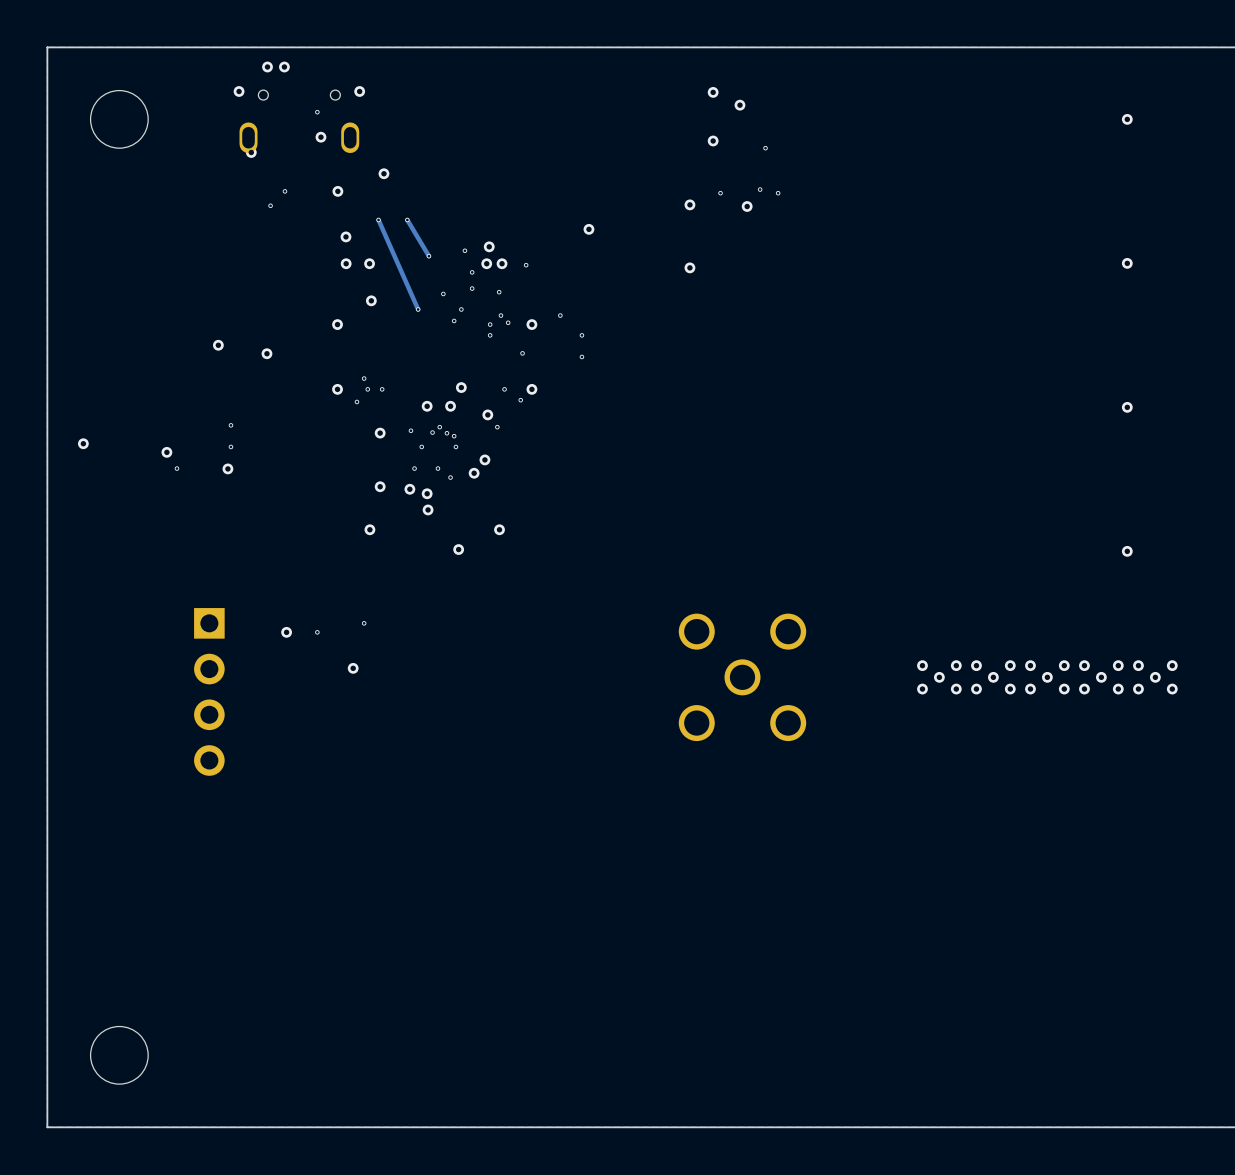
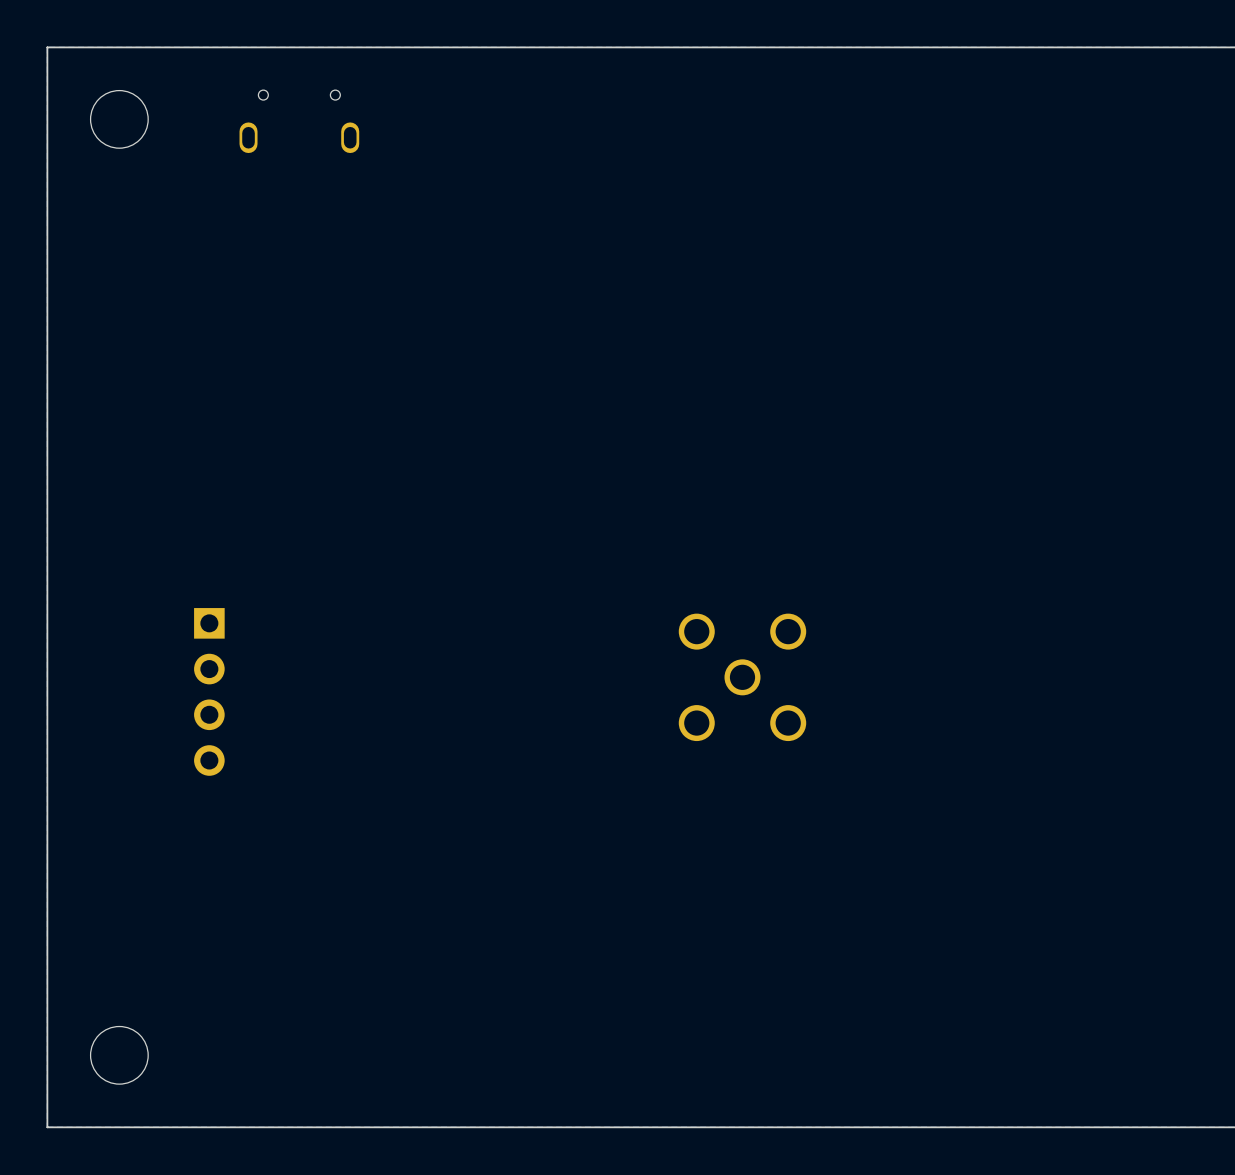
via: (267, 67) -> none
via: (284, 67) -> none
via: (239, 91) -> none
via: (359, 91) -> none
via: (713, 92) -> none
via: (739, 105) -> none
via: (317, 112) -> none
via: (1127, 119) -> none
via: (320, 137) -> none
via: (713, 140) -> none
via: (765, 148) -> none
via: (251, 152) -> none
via: (383, 173) -> none
via: (760, 189) -> none
via: (284, 191) -> none
via: (337, 191) -> none
via: (720, 193) -> none
via: (778, 193) -> none
via: (689, 204) -> none
via: (270, 205) -> none
via: (747, 206) -> none
track: (378, 219) (418, 309) -> none
via: (378, 219) -> none
track: (407, 219) (428, 256) -> none
via: (407, 219) -> none
via: (588, 229) -> none
via: (345, 236) -> none
via: (489, 246) -> none
via: (464, 250) -> none
via: (428, 256) -> none
via: (346, 263) -> none
via: (369, 263) -> none
via: (486, 263) -> none
via: (502, 263) -> none
via: (1127, 263) -> none
via: (526, 265) -> none
via: (689, 267) -> none
via: (472, 272) -> none
via: (472, 288) -> none
via: (499, 292) -> none
via: (443, 293) -> none
via: (371, 300) -> none
via: (418, 309) -> none
via: (461, 309) -> none
via: (500, 315) -> none
via: (560, 315) -> none
via: (454, 320) -> none
via: (508, 322) -> none
via: (337, 324) -> none
via: (490, 324) -> none
via: (531, 324) -> none
via: (490, 335) -> none
via: (581, 335) -> none
via: (218, 345) -> none
via: (266, 353) -> none
via: (522, 353) -> none
via: (581, 356) -> none
via: (364, 378) -> none
via: (461, 387) -> none
via: (337, 389) -> none
via: (367, 389) -> none
via: (382, 389) -> none
via: (504, 389) -> none
via: (531, 389) -> none
via: (520, 400) -> none
via: (356, 401) -> none
via: (427, 406) -> none
via: (450, 406) -> none
via: (1127, 407) -> none
via: (487, 414) -> none
via: (230, 425) -> none
via: (439, 427) -> none
via: (497, 427) -> none
via: (410, 430) -> none
via: (432, 432) -> none
via: (380, 433) -> none
via: (446, 433) -> none
via: (454, 436) -> none
via: (83, 443) -> none
via: (230, 446) -> none
via: (421, 446) -> none
via: (455, 446) -> none
via: (166, 452) -> none
via: (484, 459) -> none
via: (176, 468) -> none
via: (227, 468) -> none
via: (414, 468) -> none
via: (437, 468) -> none
via: (474, 473) -> none
via: (450, 477) -> none
via: (380, 486) -> none
via: (409, 489) -> none
via: (427, 493) -> none
via: (428, 509) -> none
via: (369, 529) -> none
via: (499, 529) -> none
via: (458, 549) -> none
via: (1127, 551) -> none
via: (364, 623) -> none
via: (286, 632) -> none
via: (317, 632) -> none
via: (922, 665) -> none
via: (956, 665) -> none
via: (976, 665) -> none
via: (1010, 665) -> none
via: (1030, 665) -> none
via: (1064, 665) -> none
via: (1084, 665) -> none
via: (1118, 665) -> none
via: (1138, 665) -> none
via: (1172, 665) -> none
via: (353, 668) -> none
via: (939, 677) -> none
via: (993, 677) -> none
via: (1047, 677) -> none
via: (1101, 677) -> none
via: (1155, 677) -> none
via: (922, 689) -> none
via: (956, 689) -> none
via: (976, 689) -> none
via: (1010, 689) -> none
via: (1030, 689) -> none
via: (1064, 689) -> none
via: (1084, 689) -> none
via: (1118, 689) -> none
via: (1138, 689) -> none
via: (1172, 689) -> none

